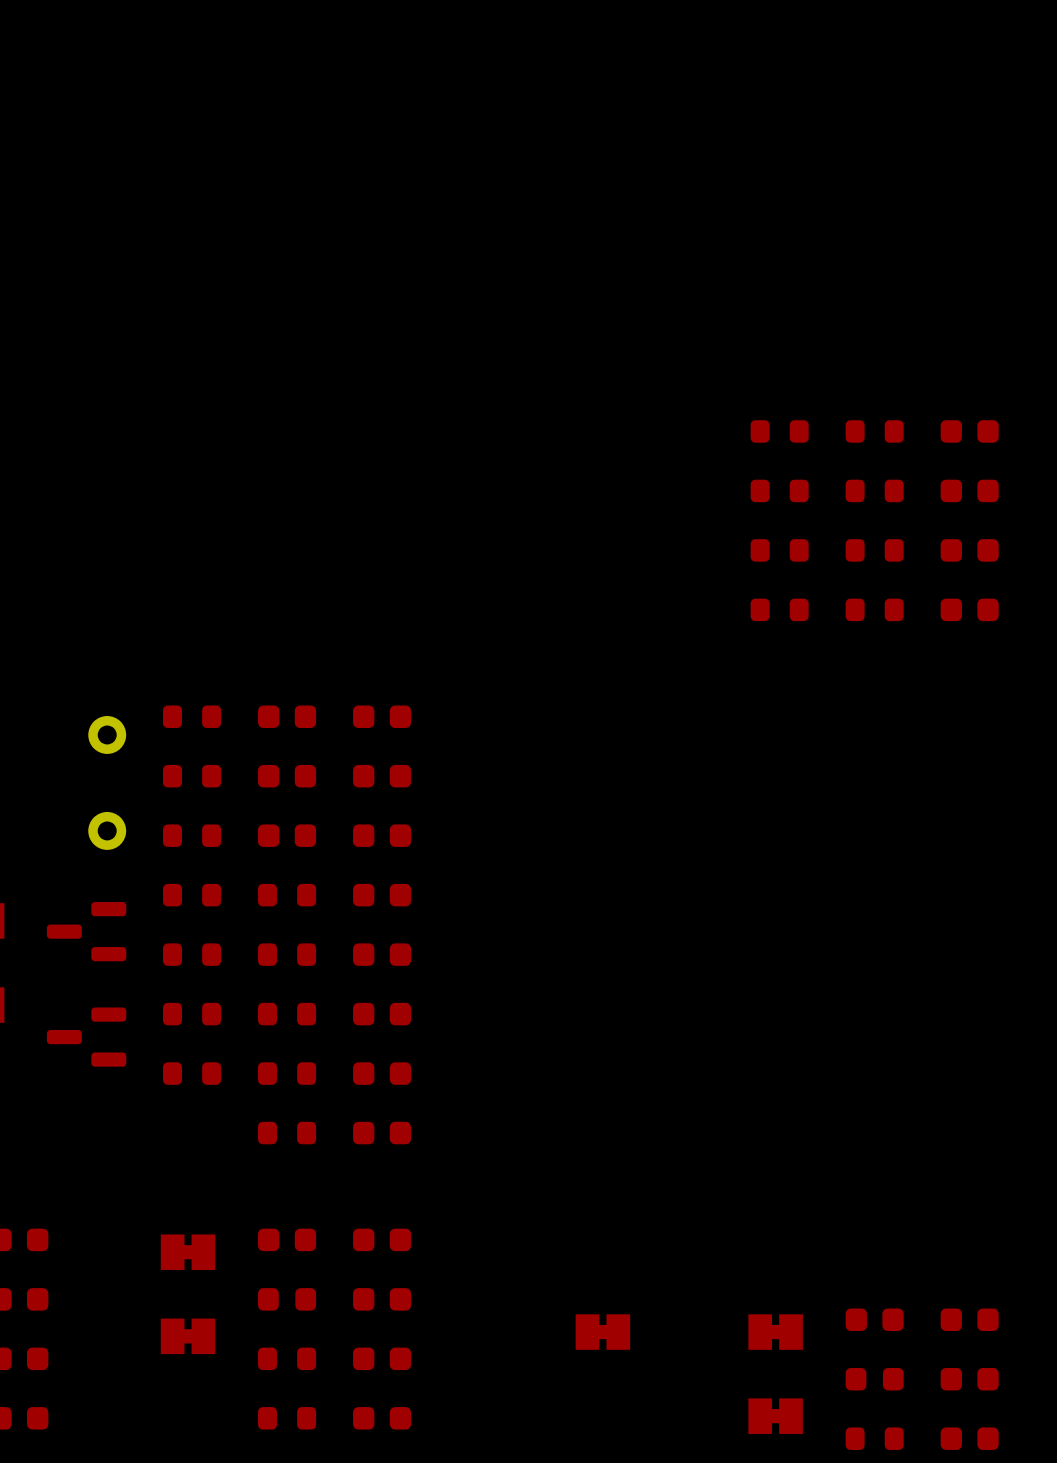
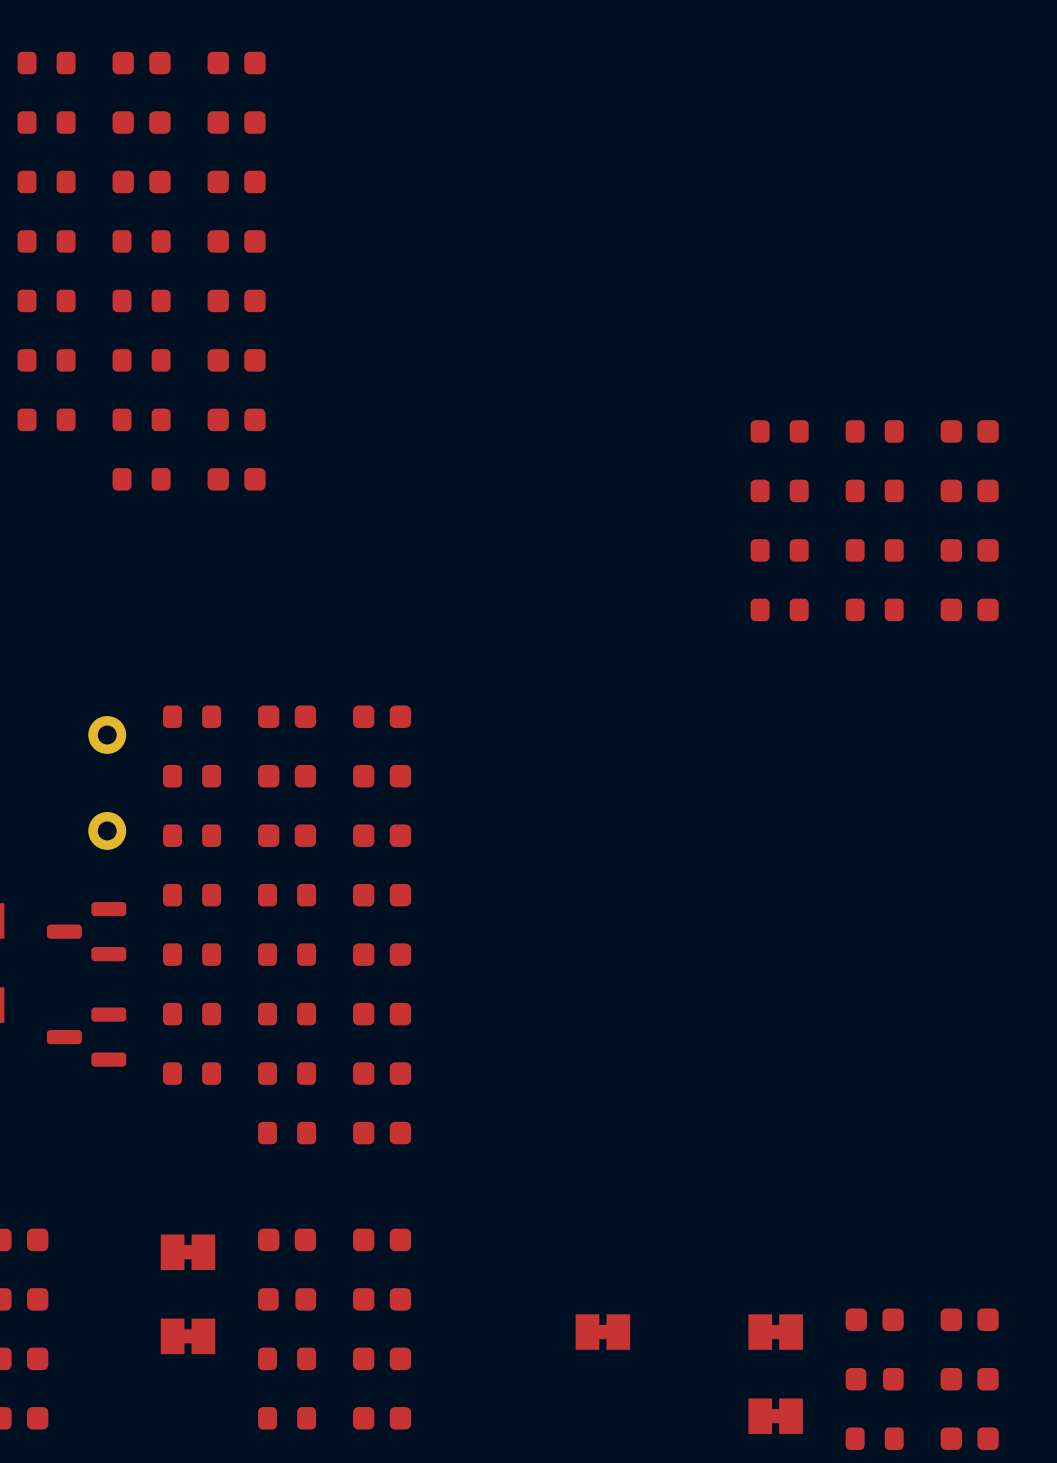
part: none -> (46, 63)
part: none -> (141, 63)
part: none -> (236, 63)
part: none -> (46, 122)
part: none -> (141, 122)
part: none -> (236, 122)
part: none -> (46, 181)
part: none -> (141, 181)
part: none -> (236, 181)
part: none -> (46, 241)
part: none -> (141, 241)
part: none -> (236, 241)
part: none -> (46, 300)
part: none -> (141, 300)
part: none -> (236, 300)
part: none -> (46, 360)
part: none -> (141, 360)
part: none -> (236, 360)
part: none -> (46, 419)
part: none -> (141, 419)
part: none -> (236, 419)
part: none -> (141, 479)
part: none -> (236, 479)

